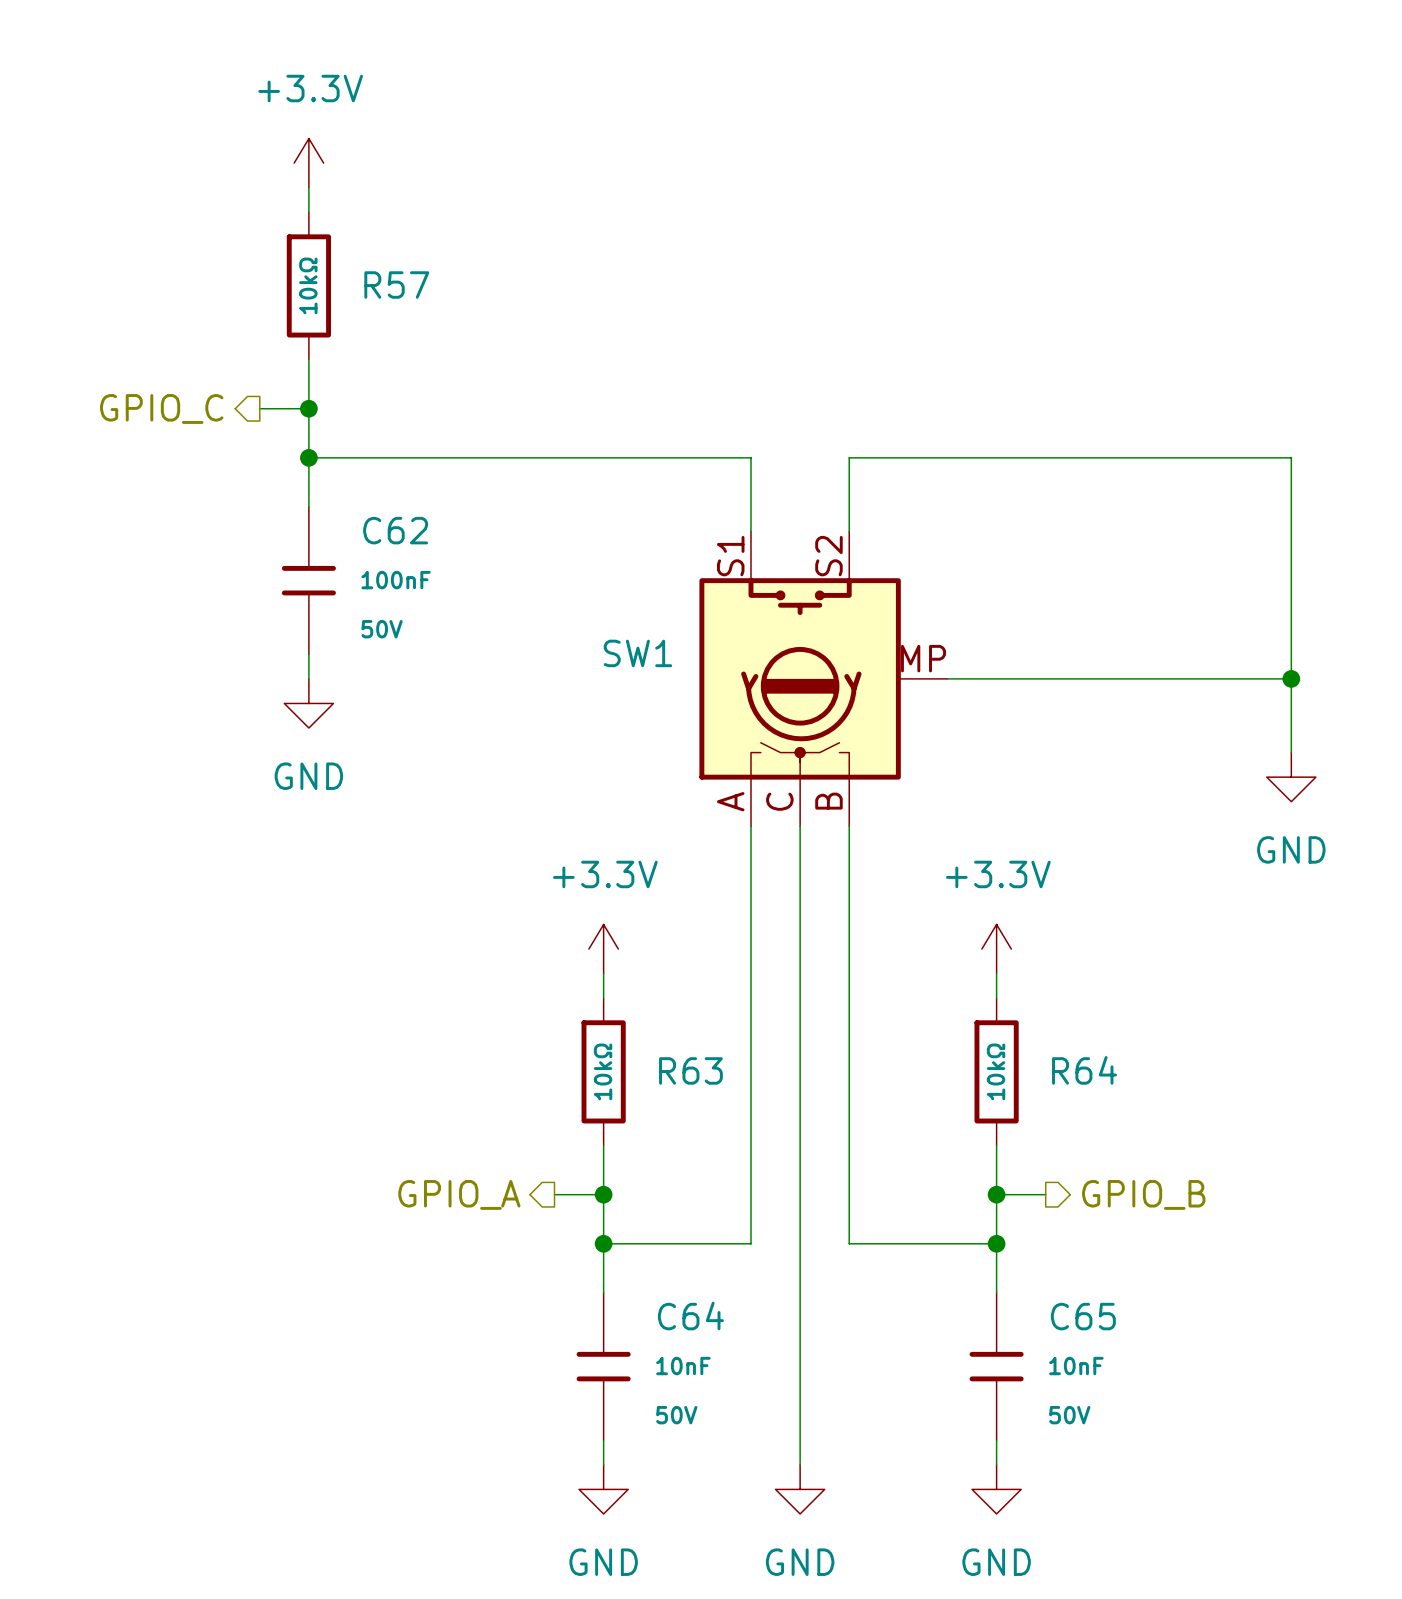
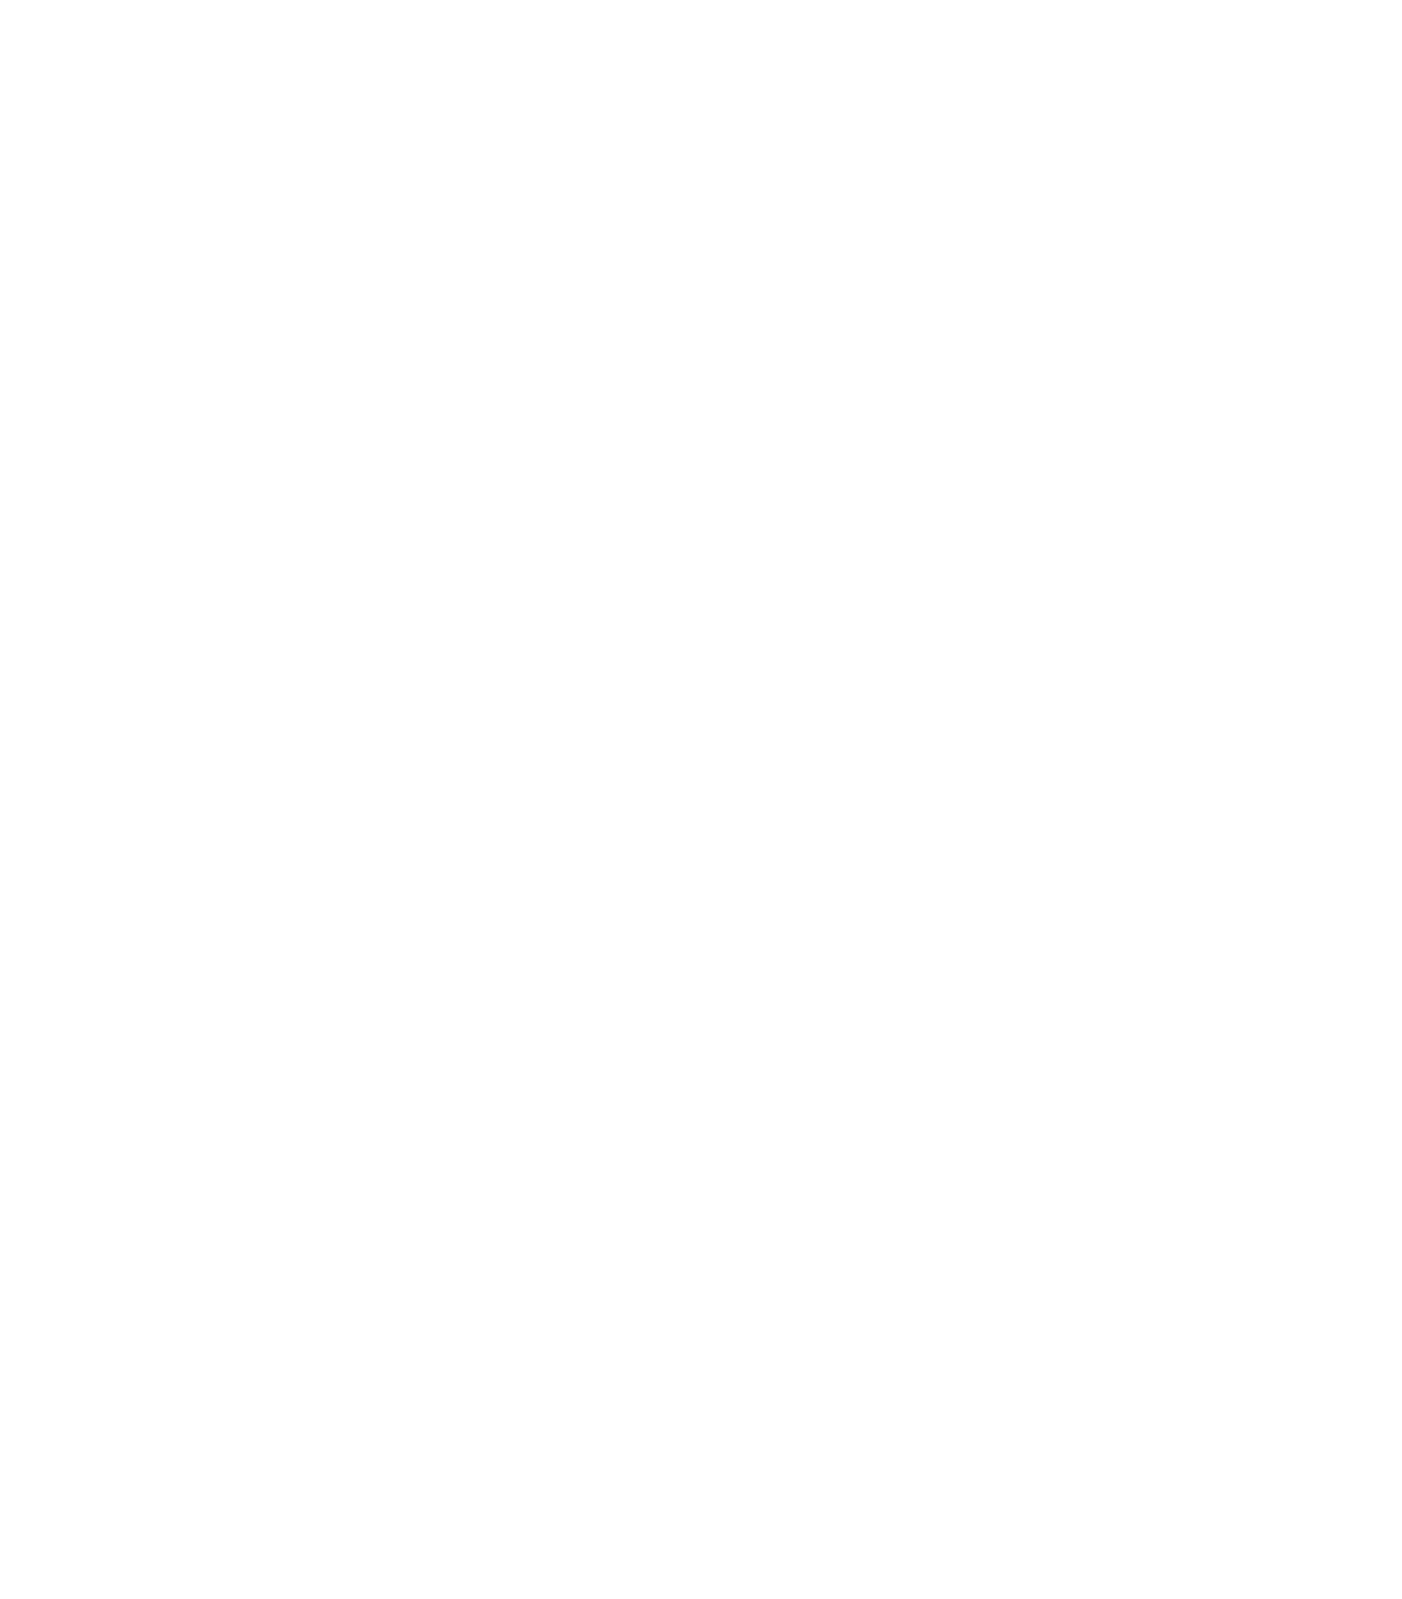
power symbol: +3.3V (308, 163) -> none
wire: (308, 187) (308, 212) -> none
R57: 10kΩ (308, 285) -> none
wire: (308, 359) (308, 506) -> none
hierarchical label: GPIO_C (161, 408) -> none
wire: (259, 408) (308, 408) -> none
junction: (308, 408) -> none
wire: (308, 457) (750, 457) (750, 531) -> none
junction: (308, 457) -> none
wire: (849, 531) (849, 457) (1291, 457) (1291, 752) -> none
C62: 100nF (308, 580) -> none
wire: (308, 654) (308, 678) -> none
SW1: (823, 678) -> none
wire: (947, 678) (1291, 678) -> none
junction: (1291, 678) -> none
power symbol: GND (308, 703) -> none
power symbol: GND (1291, 777) -> none
wire: (750, 826) (750, 1243) (603, 1243) -> none
wire: (800, 826) (800, 1464) -> none
wire: (849, 826) (849, 1243) (996, 1243) -> none
power symbol: +3.3V (603, 949) -> none
power symbol: +3.3V (996, 949) -> none
wire: (603, 973) (603, 998) -> none
wire: (996, 973) (996, 998) -> none
R63: 10kΩ (603, 1071) -> none
R64: 10kΩ (996, 1071) -> none
wire: (603, 1145) (603, 1292) -> none
wire: (996, 1145) (996, 1292) -> none
hierarchical label: GPIO_A (459, 1194) -> none
wire: (554, 1194) (603, 1194) -> none
junction: (603, 1194) -> none
wire: (996, 1194) (1045, 1194) -> none
junction: (996, 1194) -> none
hierarchical label: GPIO_B (1143, 1194) -> none
junction: (603, 1243) -> none
junction: (996, 1243) -> none
C64: 10nF (603, 1366) -> none
C65: 10nF (996, 1366) -> none
wire: (603, 1440) (603, 1464) -> none
wire: (996, 1440) (996, 1464) -> none
power symbol: GND (603, 1489) -> none
power symbol: GND (800, 1489) -> none
power symbol: GND (996, 1489) -> none

